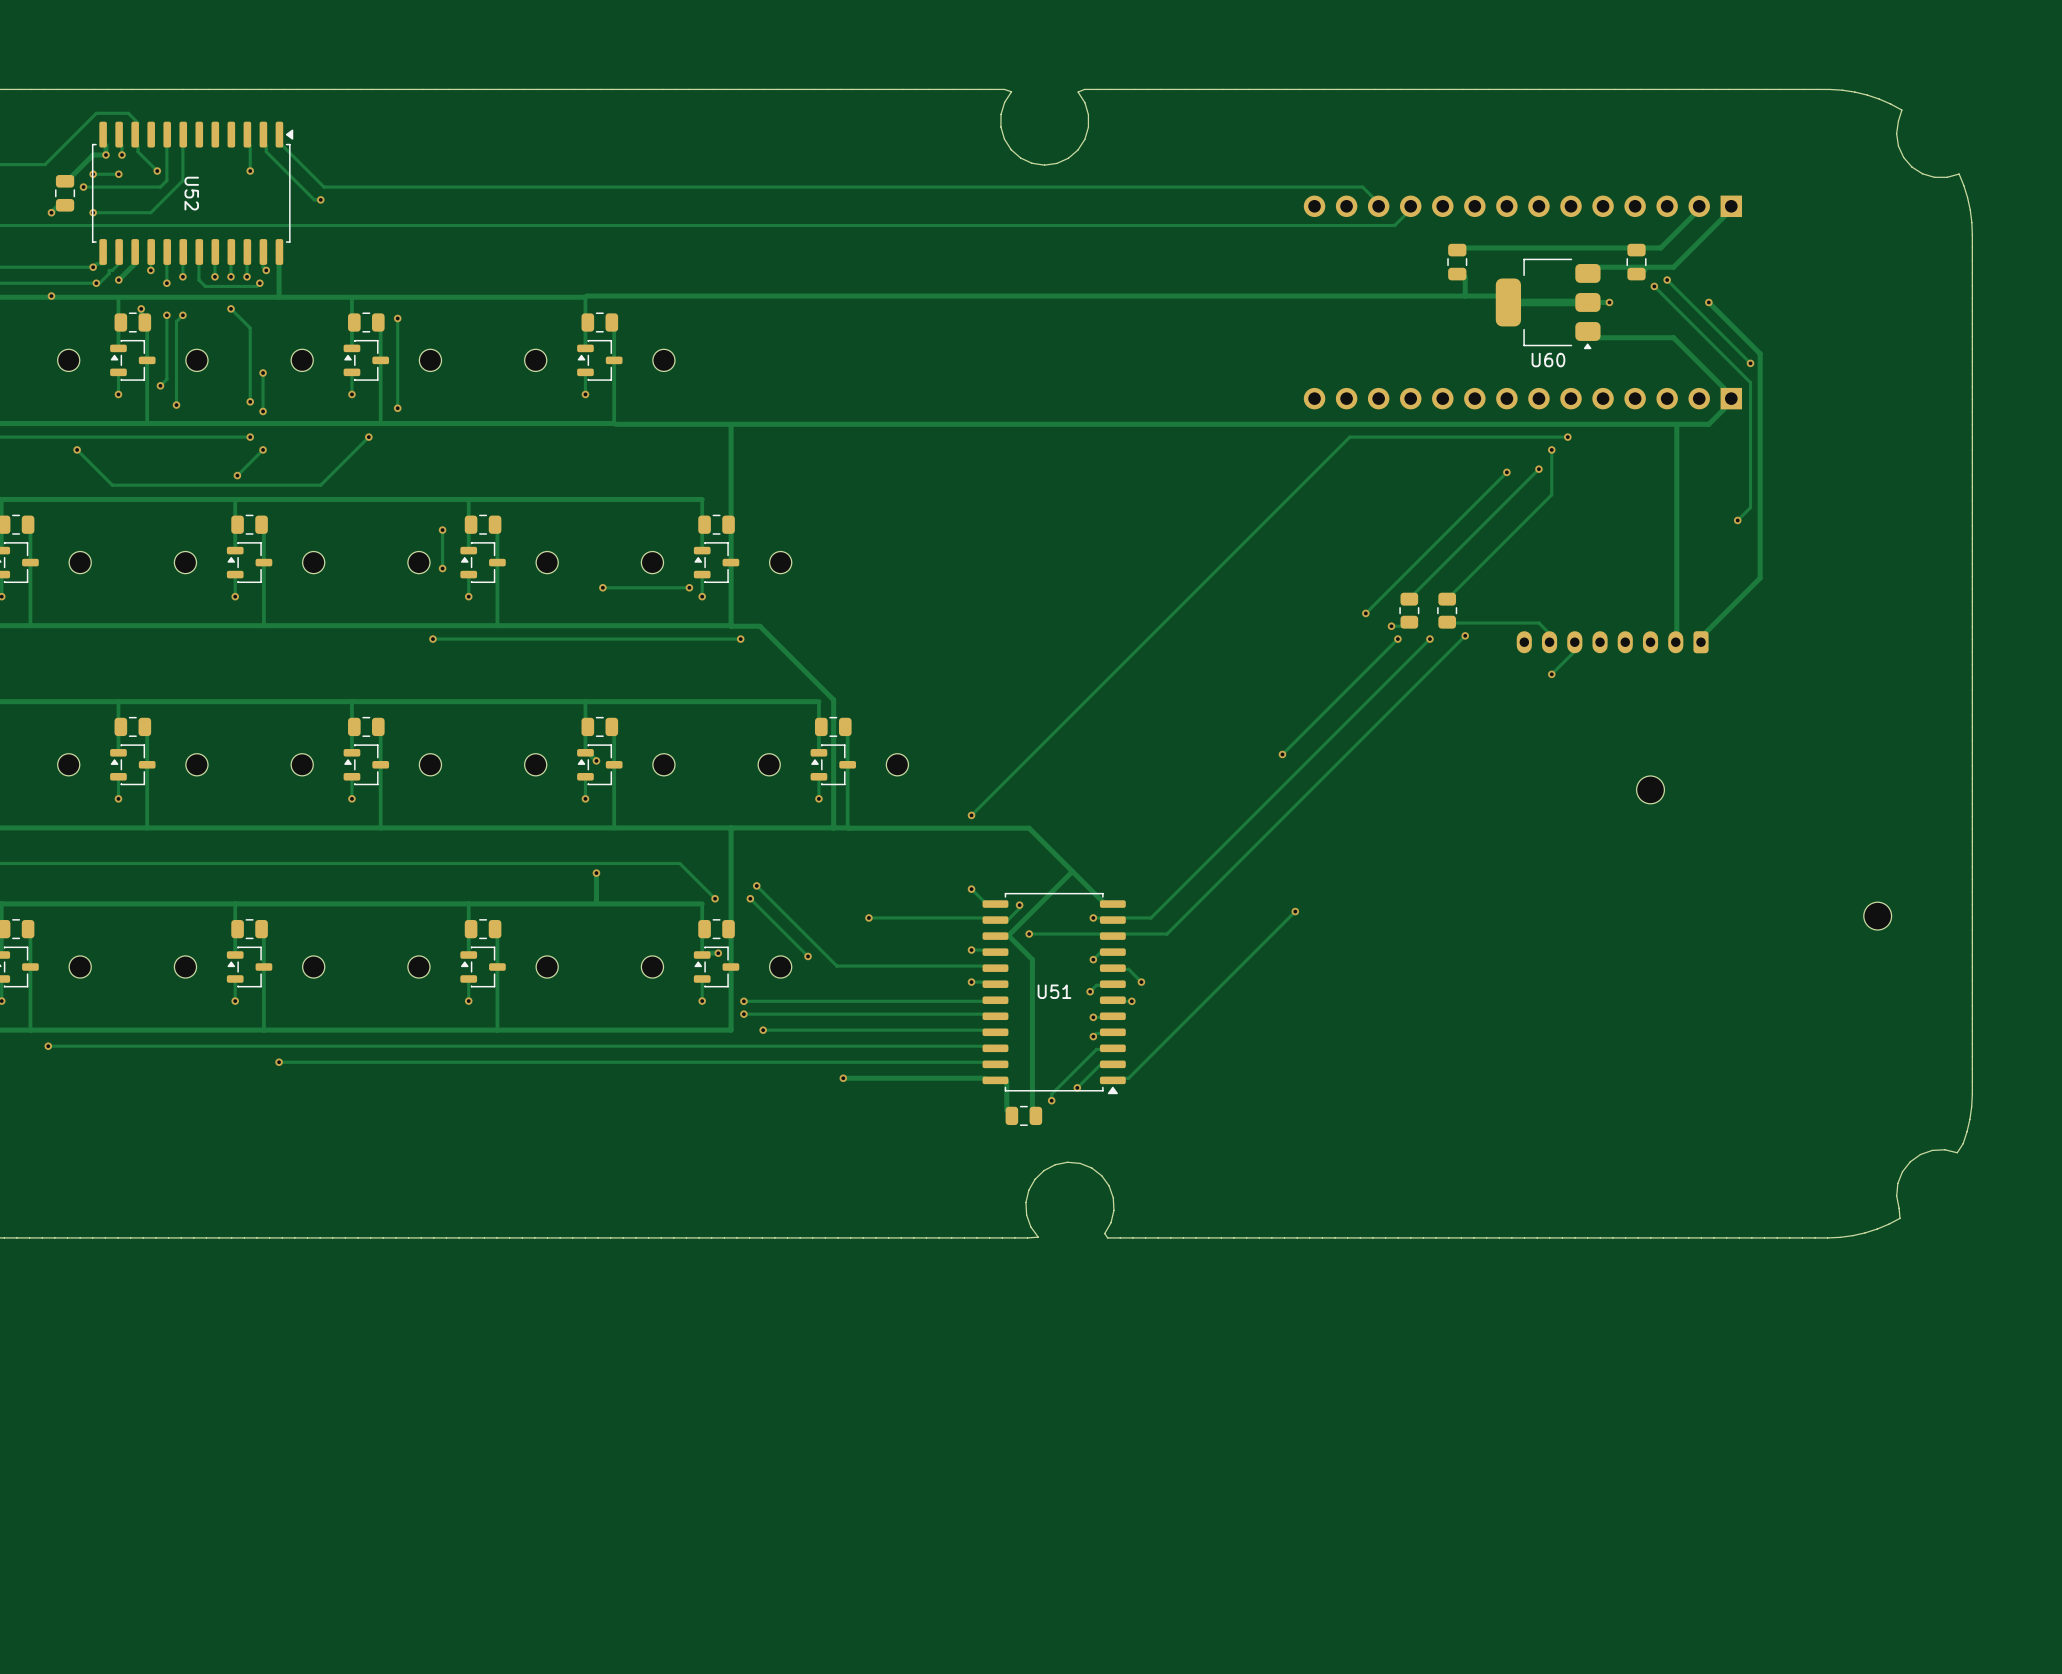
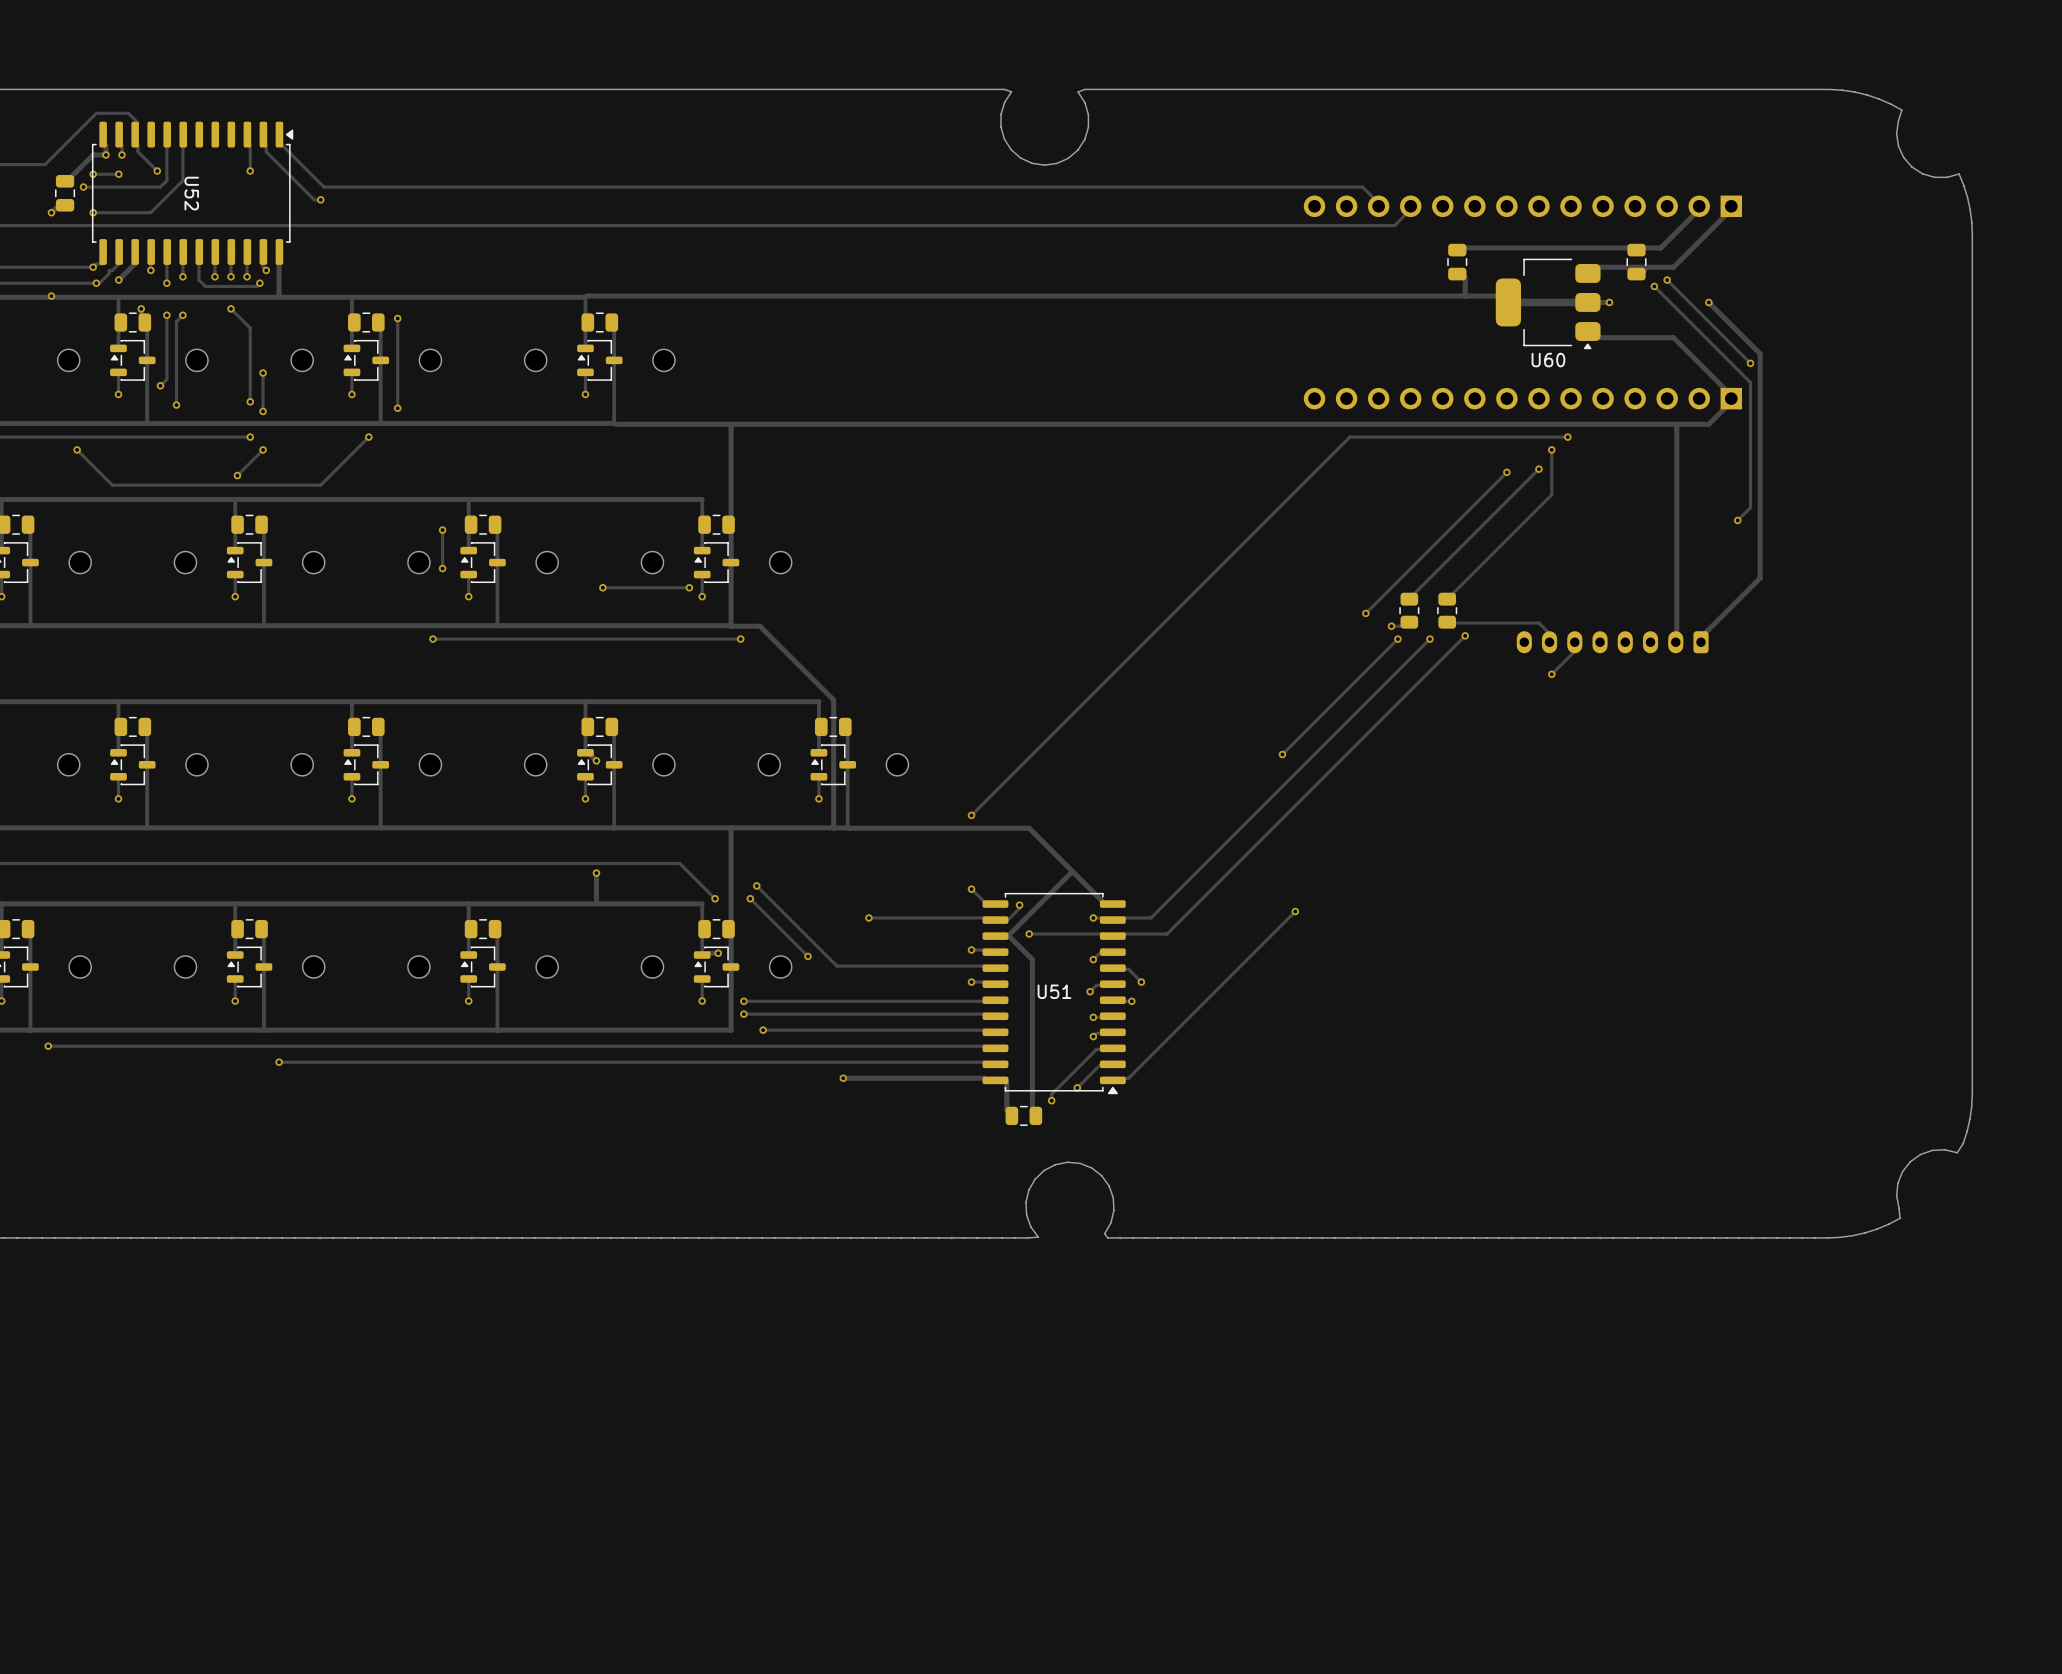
part: (1650, 789) -> none
part: (1877, 916) -> none

